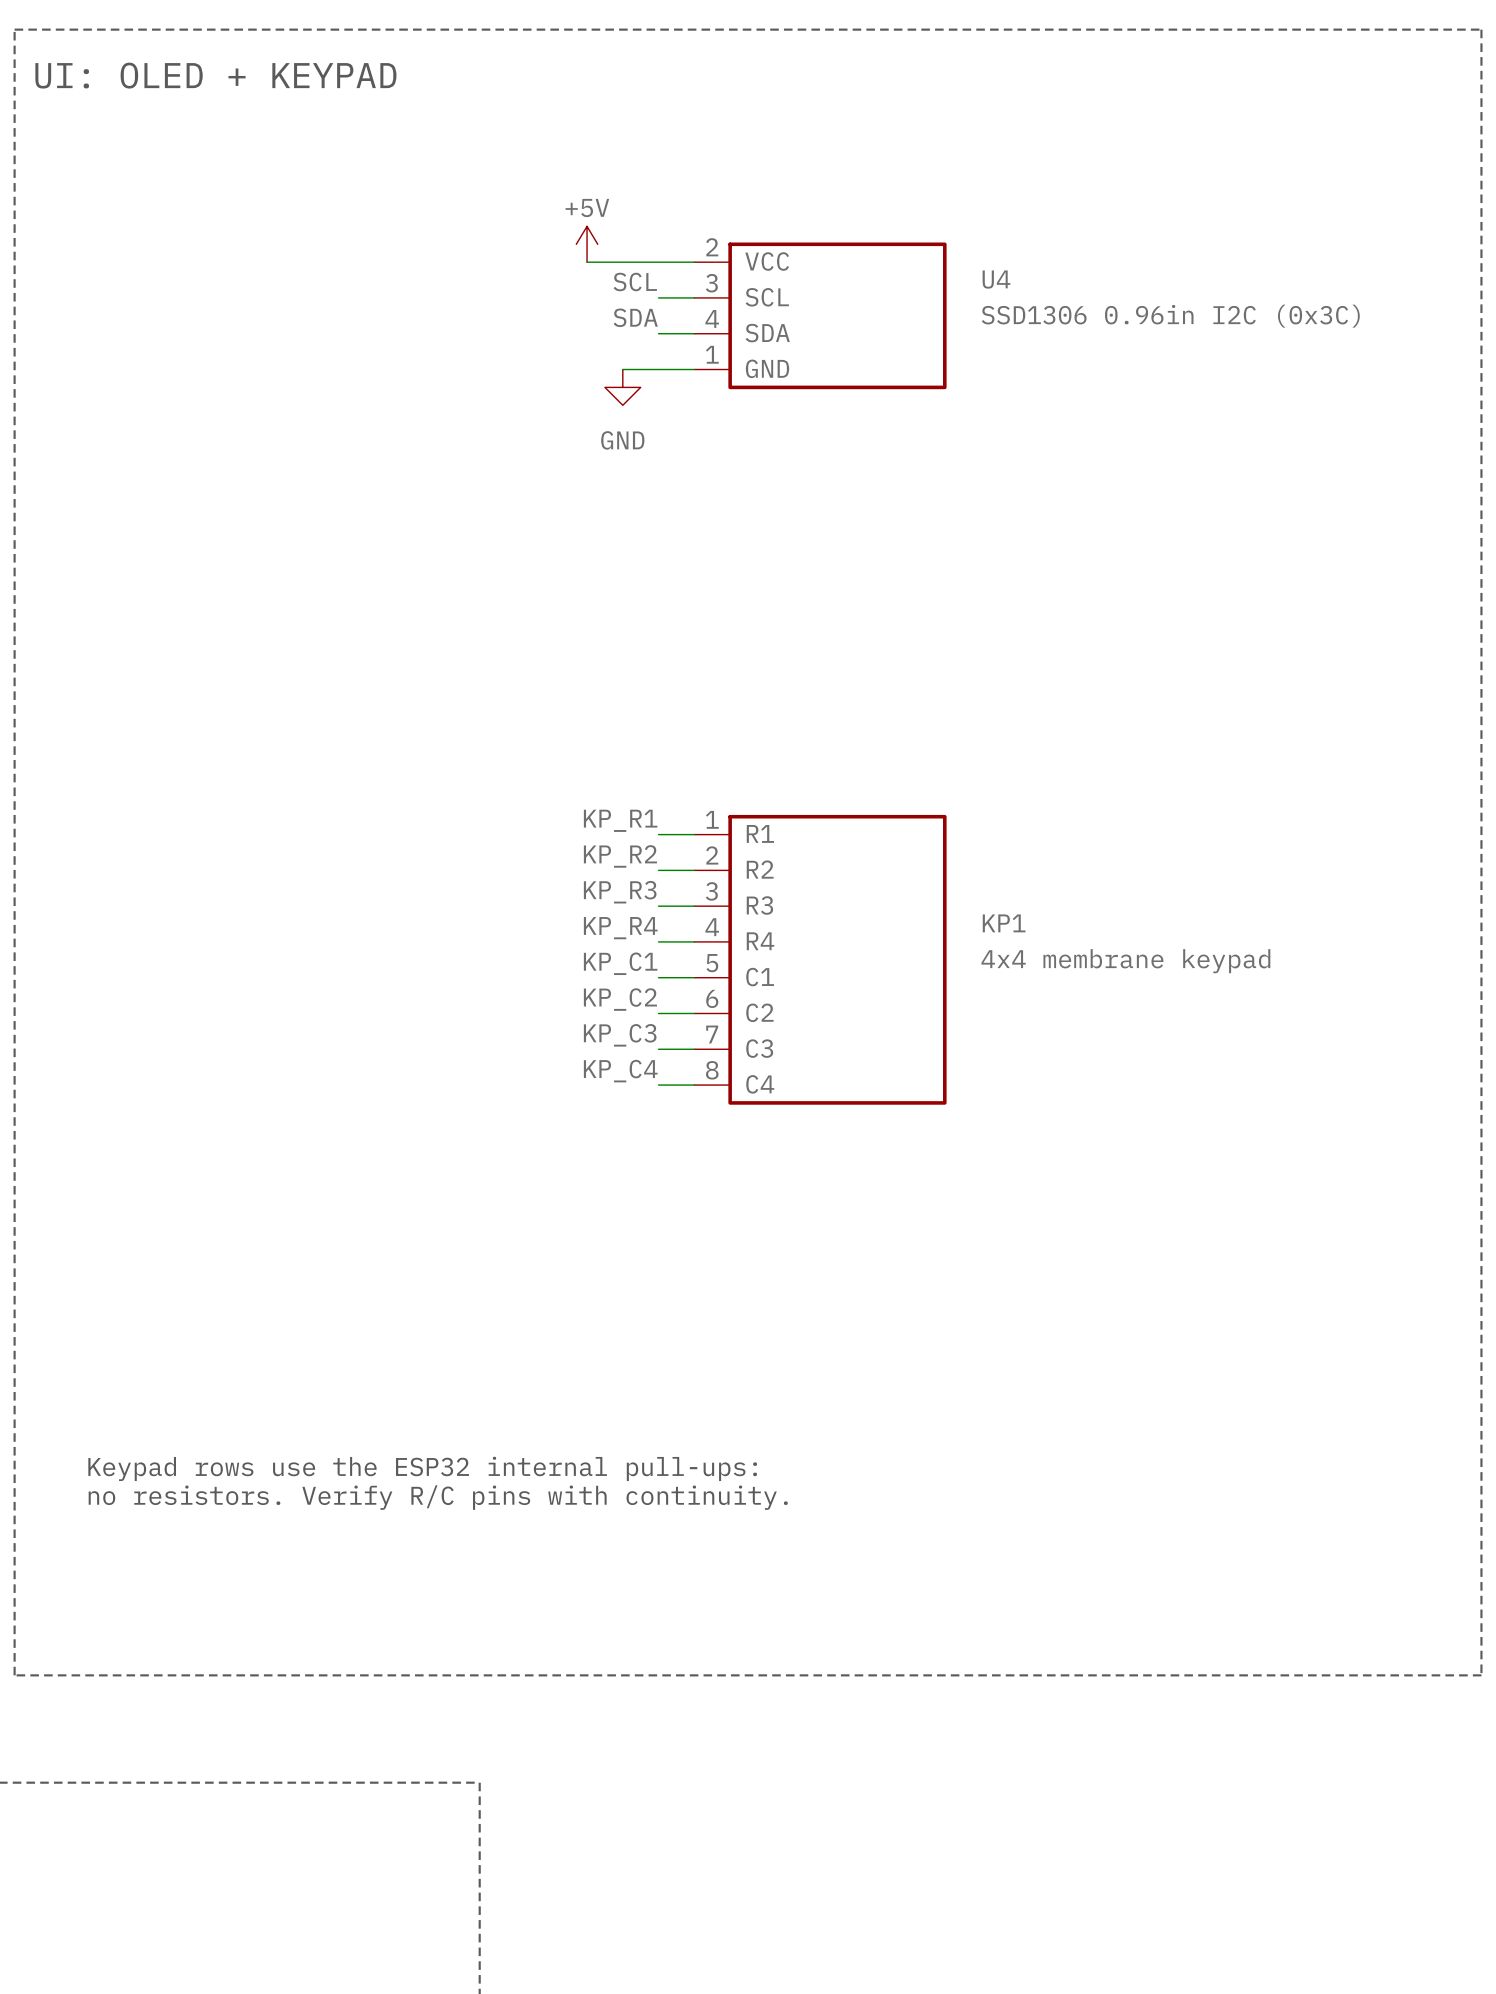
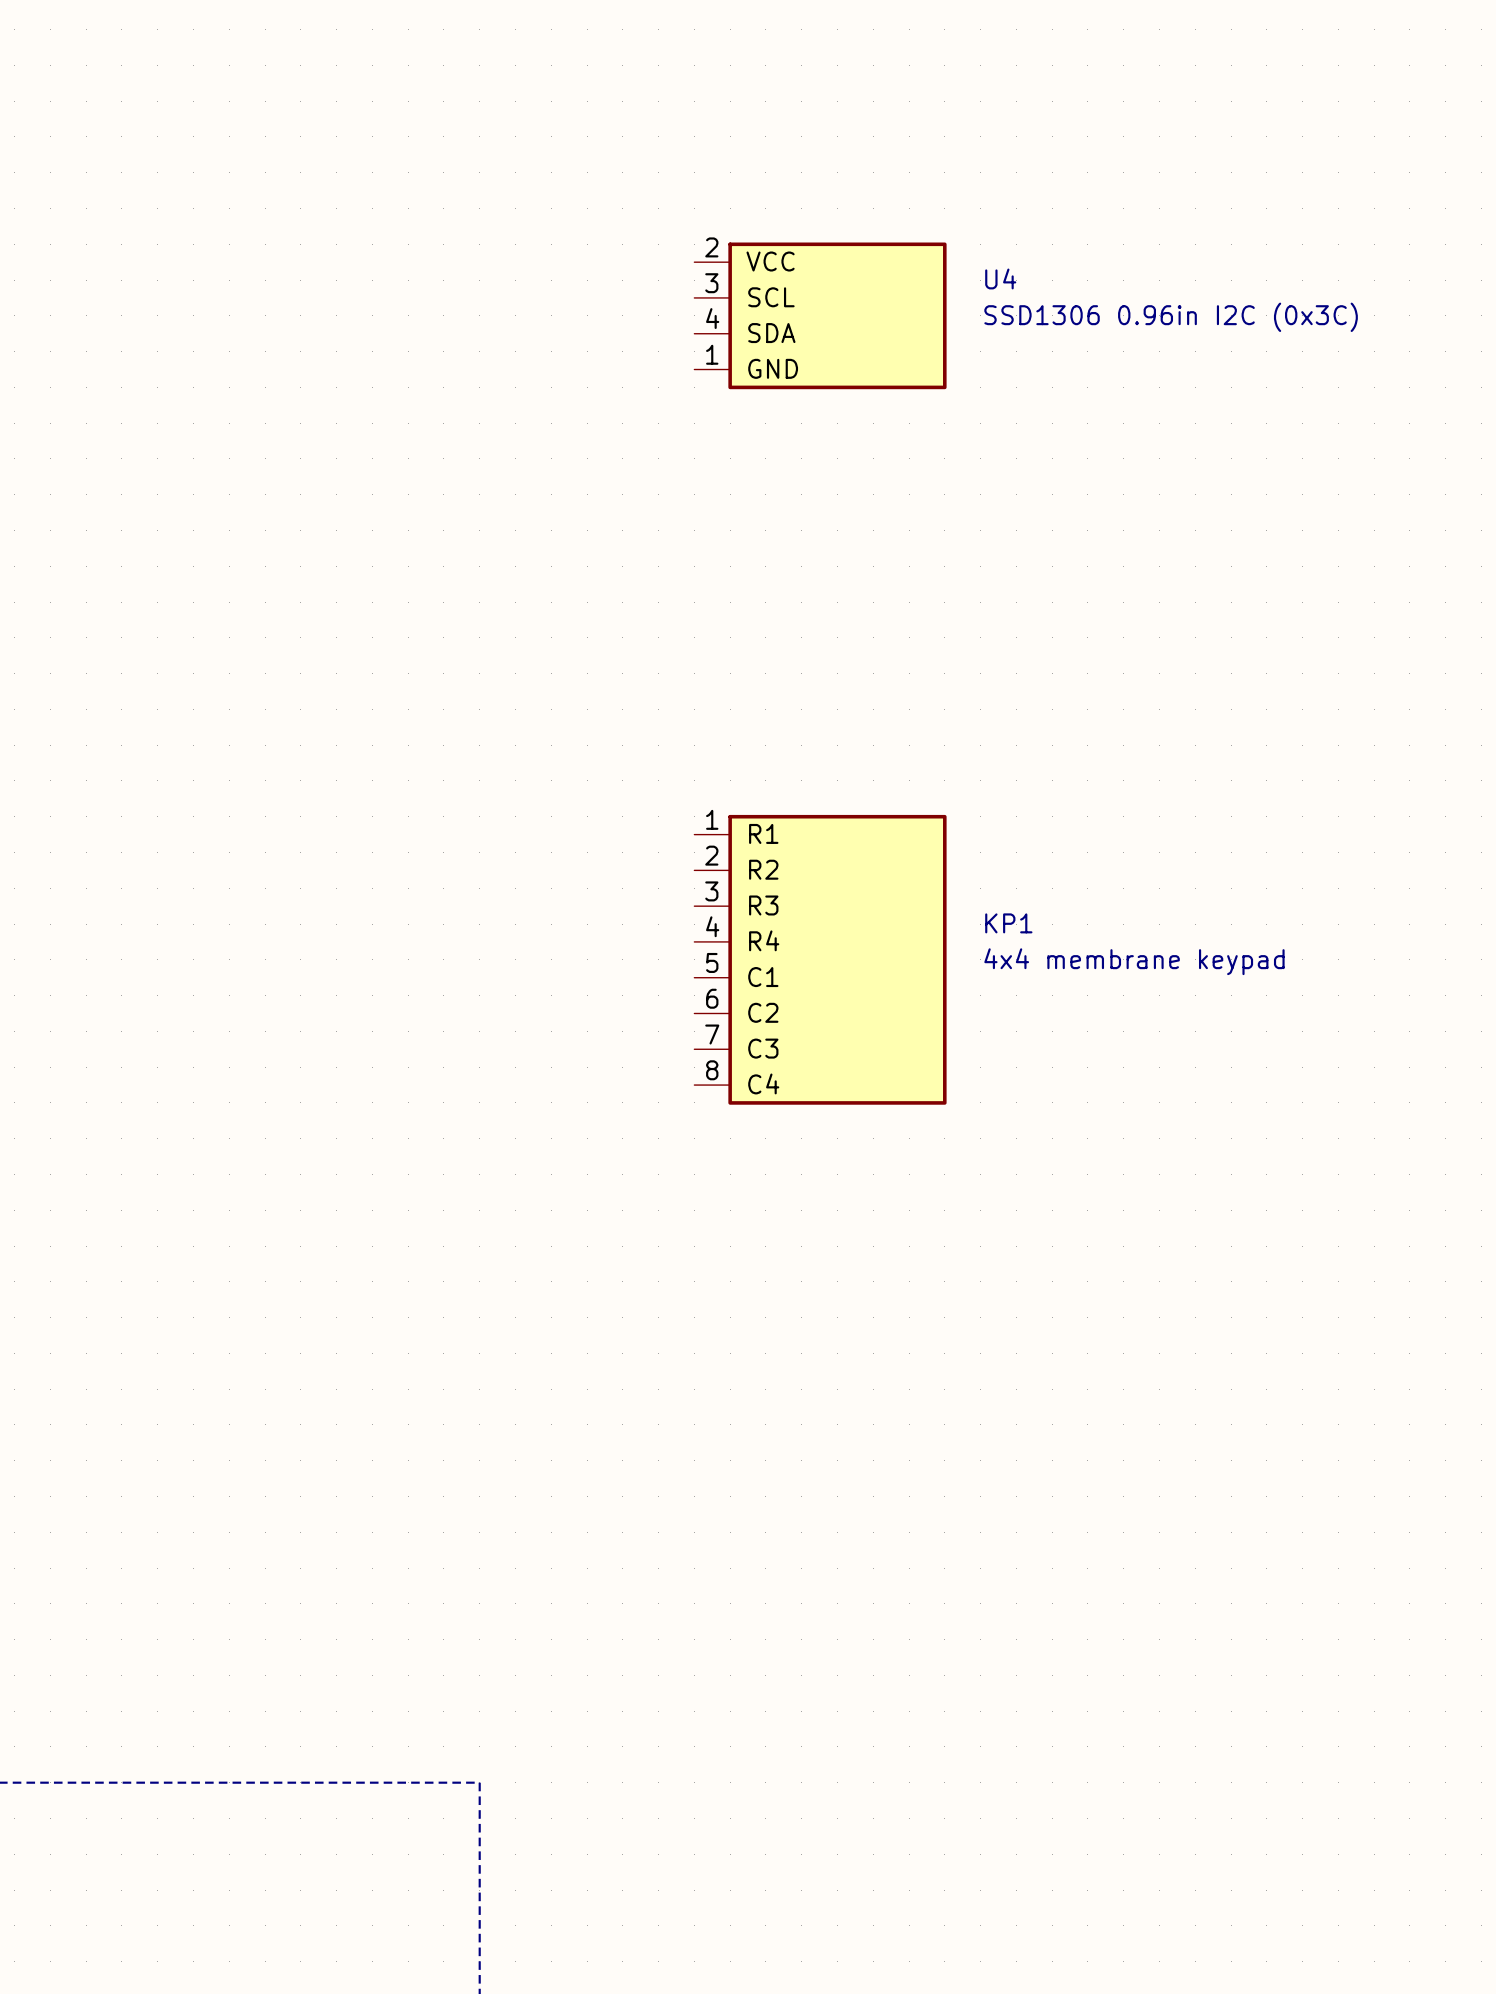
line: (14, 29) (1481, 29) (1481, 1675) (14, 1675) (14, 29) -> none
text: UI: OLED + KEYPAD (215, 75) -> none
power symbol: +5V (587, 244) -> none
wire: (587, 262) (694, 262) -> none
label: SCL (635, 281) -> none
wire: (658, 297) (694, 297) -> none
label: SDA (635, 317) -> none
wire: (658, 333) (694, 333) -> none
wire: (622, 369) (694, 369) -> none
power symbol: GND (622, 387) -> none
label: KP_R1 (620, 820) -> none
wire: (658, 834) (694, 834) -> none
label: KP_R2 (620, 856) -> none
wire: (658, 870) (694, 870) -> none
label: KP_R3 (620, 892) -> none
wire: (658, 906) (694, 906) -> none
label: KP_R4 (620, 928) -> none
wire: (658, 941) (694, 941) -> none
label: KP_C1 (620, 963) -> none
wire: (658, 977) (694, 977) -> none
label: KP_C2 (620, 999) -> none
wire: (658, 1013) (694, 1013) -> none
label: KP_C3 (620, 1035) -> none
wire: (658, 1049) (694, 1049) -> none
label: KP_C4 (620, 1071) -> none
wire: (658, 1085) (694, 1085) -> none
text: Keypad rows use the ESP32 internal pull-ups: (422, 1468) -> none
text: no resistors. Verify R/C pins with continuity. (438, 1497) -> none

